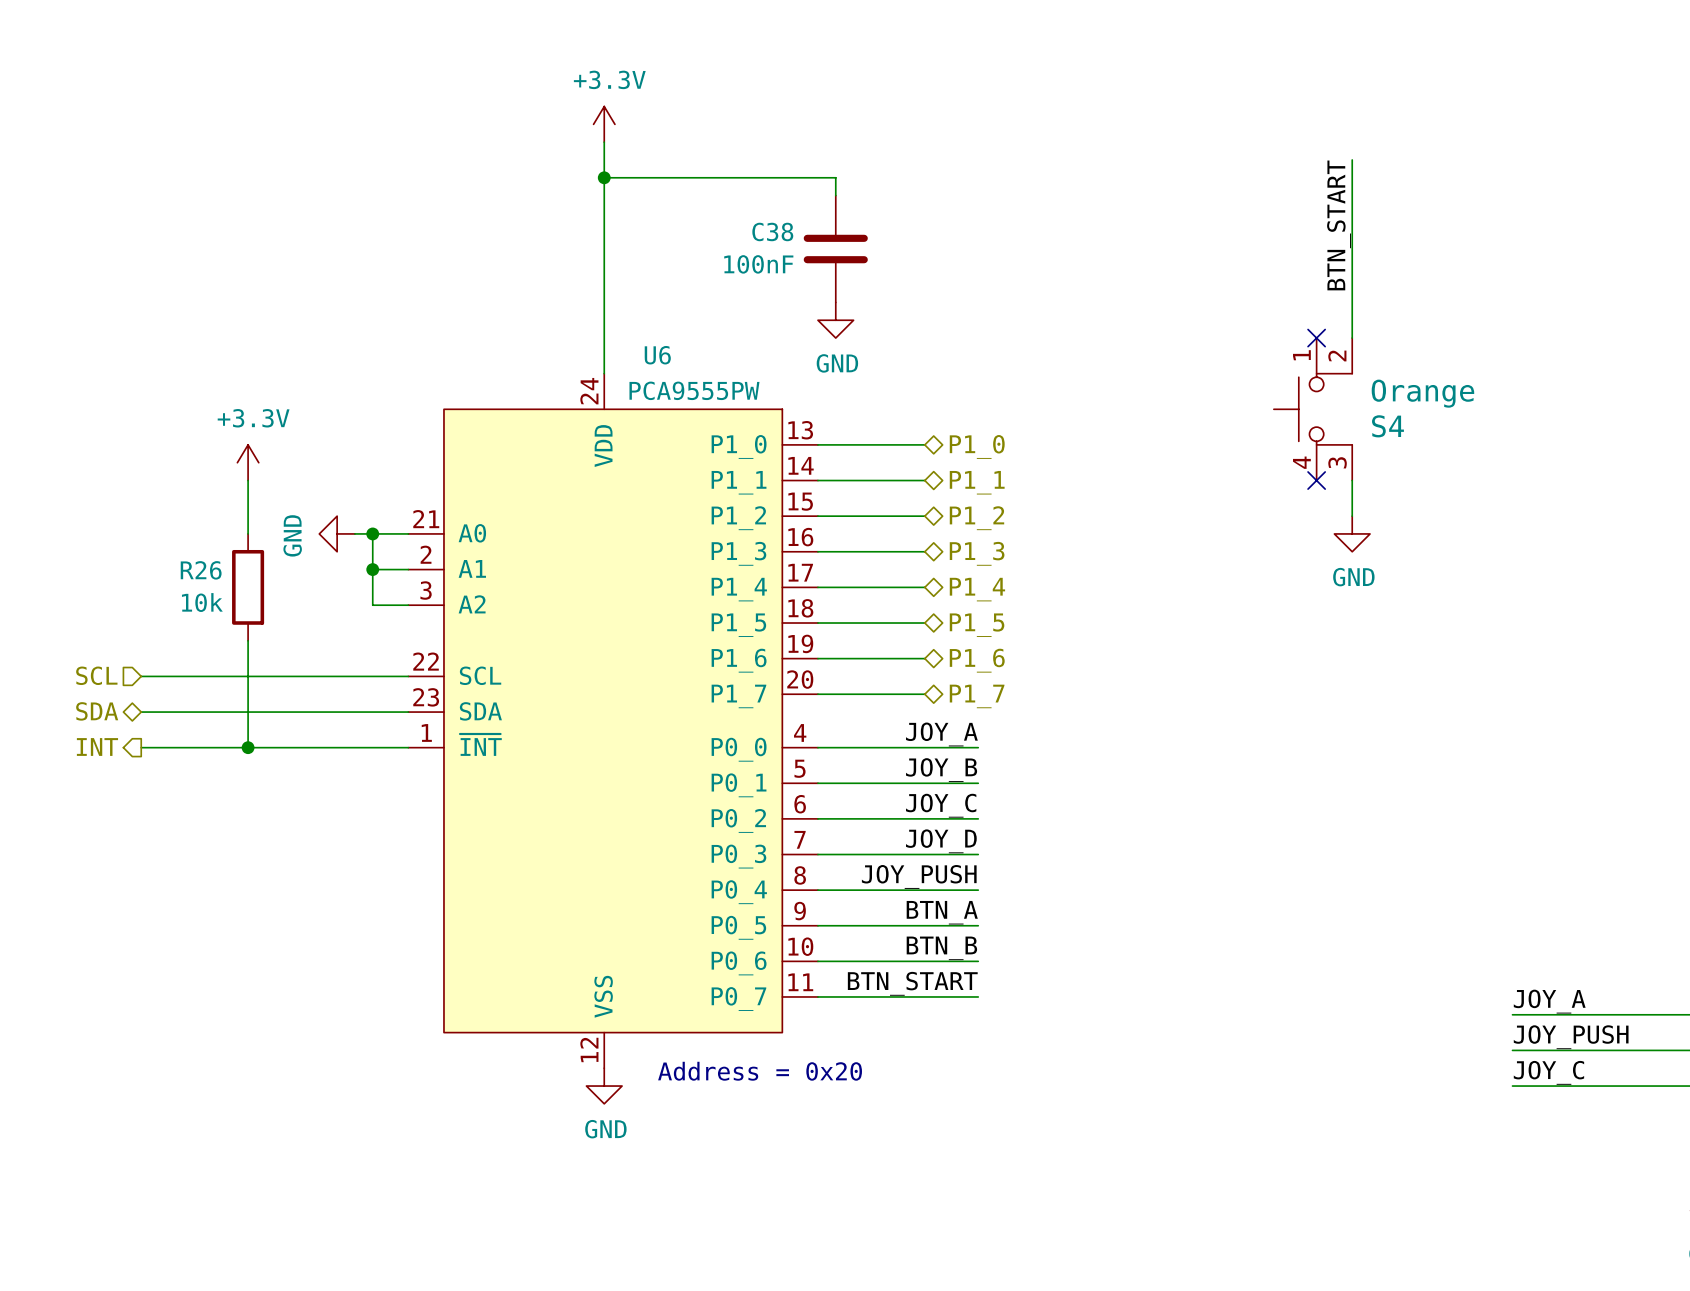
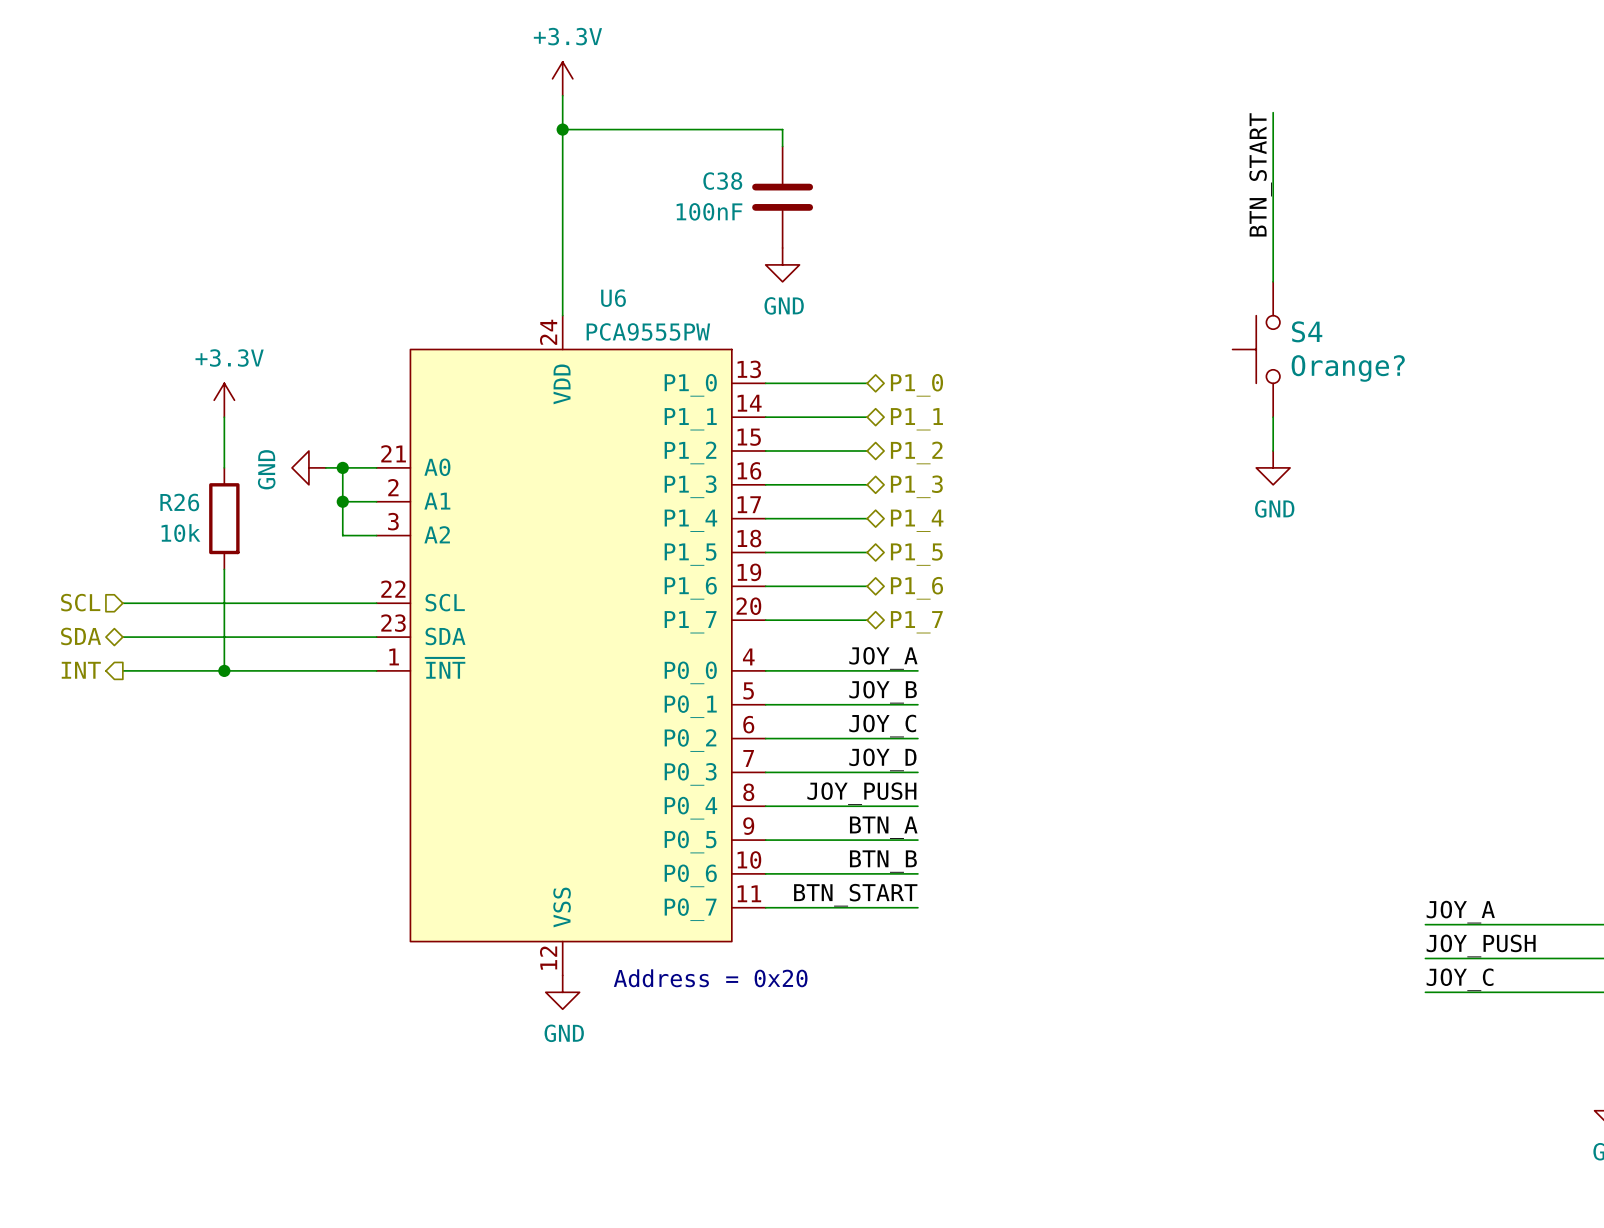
S4 symbol: [1273, 338, 1353, 481] -> [1232, 281, 1280, 418]
no-connect mark: (1316, 338) -> none
S4 value: Orange (1422, 393) -> Orange? (1348, 368)
S4 name position: S4 (1387, 426) -> S4 (1307, 331)
no-connect mark: (1316, 480) -> none

